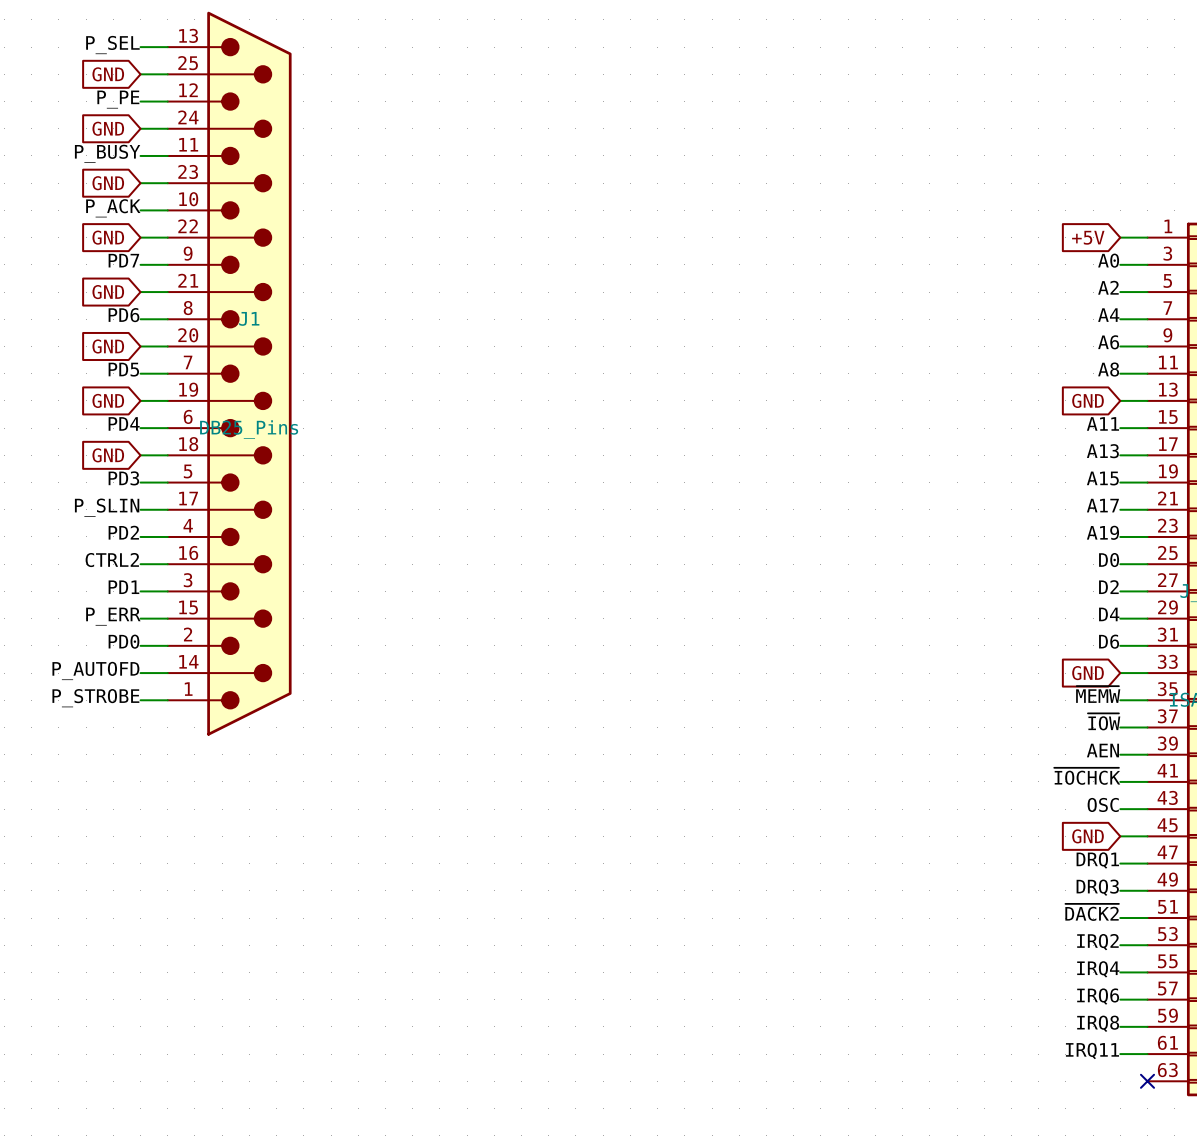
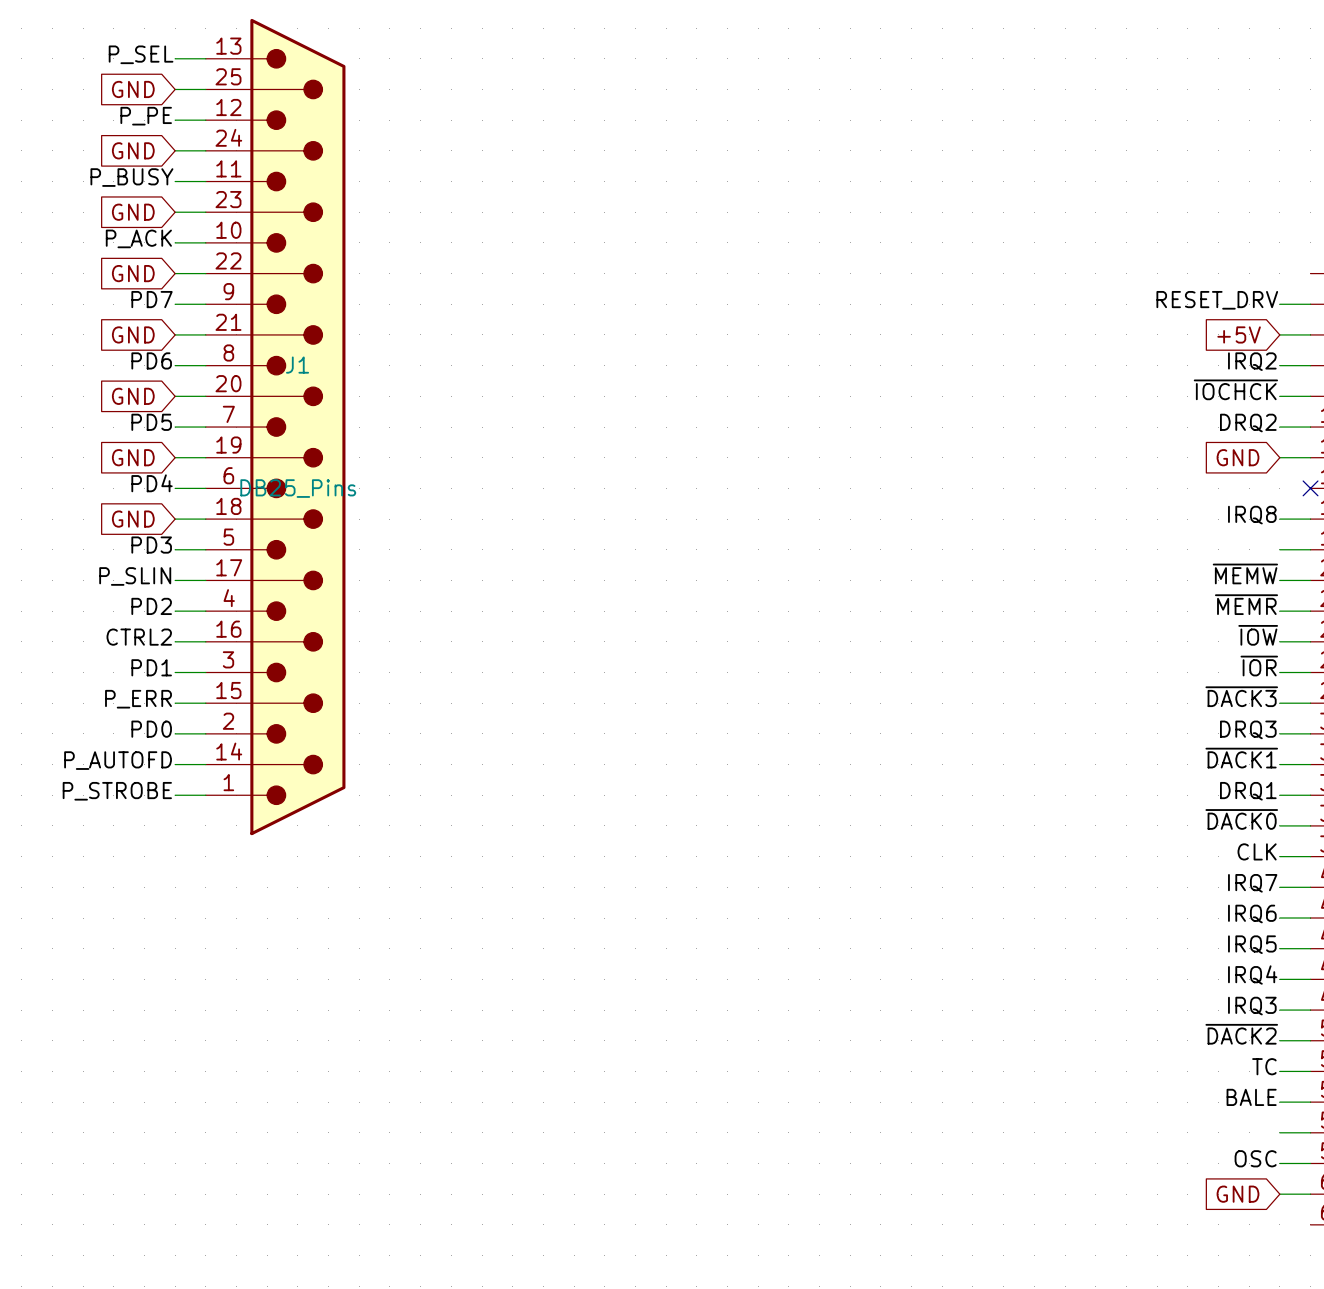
global label position: +5V (1088, 237) -> +5V (1239, 334)
wire: (1120, 237) (1147, 237) -> none
label: A0 (1108, 260) -> RESET_DRV (1217, 300)
label: A2 (1108, 287) -> none
label: A4 (1108, 315) -> IRQ2 (1252, 361)
label: A6 (1108, 342) -> ~{IOCHCK} (1235, 389)
label: A8 (1108, 369) -> DRQ2 (1248, 423)
label: A11 (1102, 423) -> none
wire: (1120, 428) (1147, 428) -> none
no-connect mark: none -> (1310, 488)
label: A13 (1102, 451) -> IRQ8 (1252, 515)
label: A15 (1102, 478) -> none
label: A17 (1102, 505) -> ~{MEMW} (1245, 573)
label: A19 (1102, 532) -> ~{MEMR} (1246, 604)
label: D0 (1109, 560) -> ~{IOW} (1258, 635)
label: D2 (1108, 587) -> ~{IOR} (1259, 666)
label: D4 (1109, 614) -> ~{DACK3} (1241, 696)
label: D6 (1109, 641) -> DRQ3 (1248, 729)
label: none -> ~{DACK1} (1241, 758)
global label: GND (1088, 673) -> none
label: ~{MEMW} (1098, 694) -> DRQ1 (1248, 791)
label: ~{IOW} (1104, 721) -> ~{DACK0} (1241, 819)
label: AEN (1102, 750) -> CLK (1257, 851)
label: ~{IOCHCK} (1087, 776) -> IRQ7 (1252, 883)
label: OSC (1103, 804) -> IRQ6 (1252, 914)
label: none -> IRQ5 (1252, 944)
global label: GND (1088, 836) -> none
label: DRQ1 (1097, 860) -> IRQ4 (1252, 975)
label: DRQ3 (1097, 887) -> IRQ3 (1252, 1006)
label: IRQ2 (1097, 942) -> TC (1264, 1066)
label: IRQ4 (1098, 969) -> BALE (1251, 1097)
label: IRQ6 (1098, 996) -> none
label: IRQ8 (1098, 1023) -> OSC (1255, 1158)
label: IRQ11 (1092, 1051) -> none
global label: none -> GND (1238, 1194)
no-connect mark: (1147, 1081) -> none

